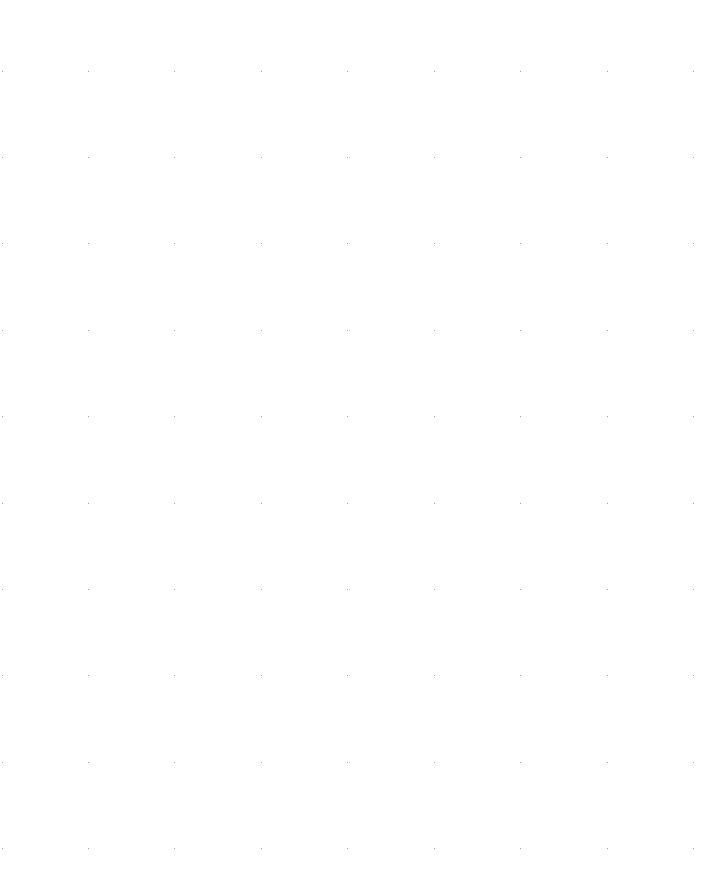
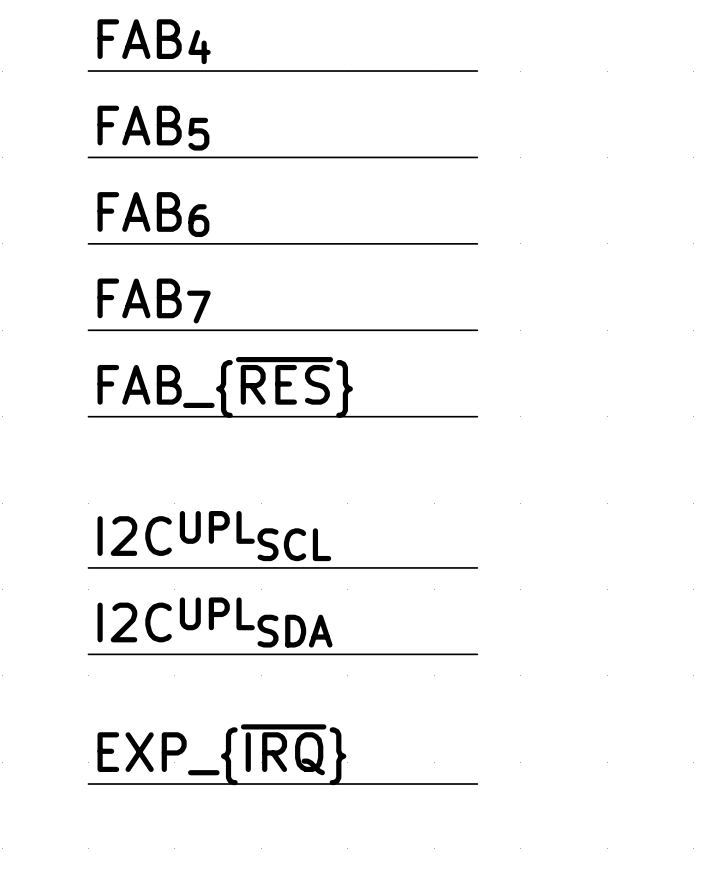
label: none -> FAB4 (154, 41)
wire: none -> (88, 71) (477, 71)
label: none -> FAB5 (153, 128)
wire: none -> (88, 157) (477, 157)
label: none -> FAB6 (153, 214)
wire: none -> (88, 243) (477, 243)
label: none -> FAB7 (154, 300)
wire: none -> (88, 330) (477, 330)
label: none -> FAB_{~{RES}} (225, 387)
wire: none -> (88, 416) (477, 416)
label: none -> I2CUPLSCL (214, 536)
wire: none -> (88, 567) (477, 567)
label: none -> I2CUPLSDA (215, 622)
wire: none -> (88, 654) (477, 654)
label: none -> EXP_{~{IRQ}} (221, 754)
wire: none -> (88, 784) (477, 784)

